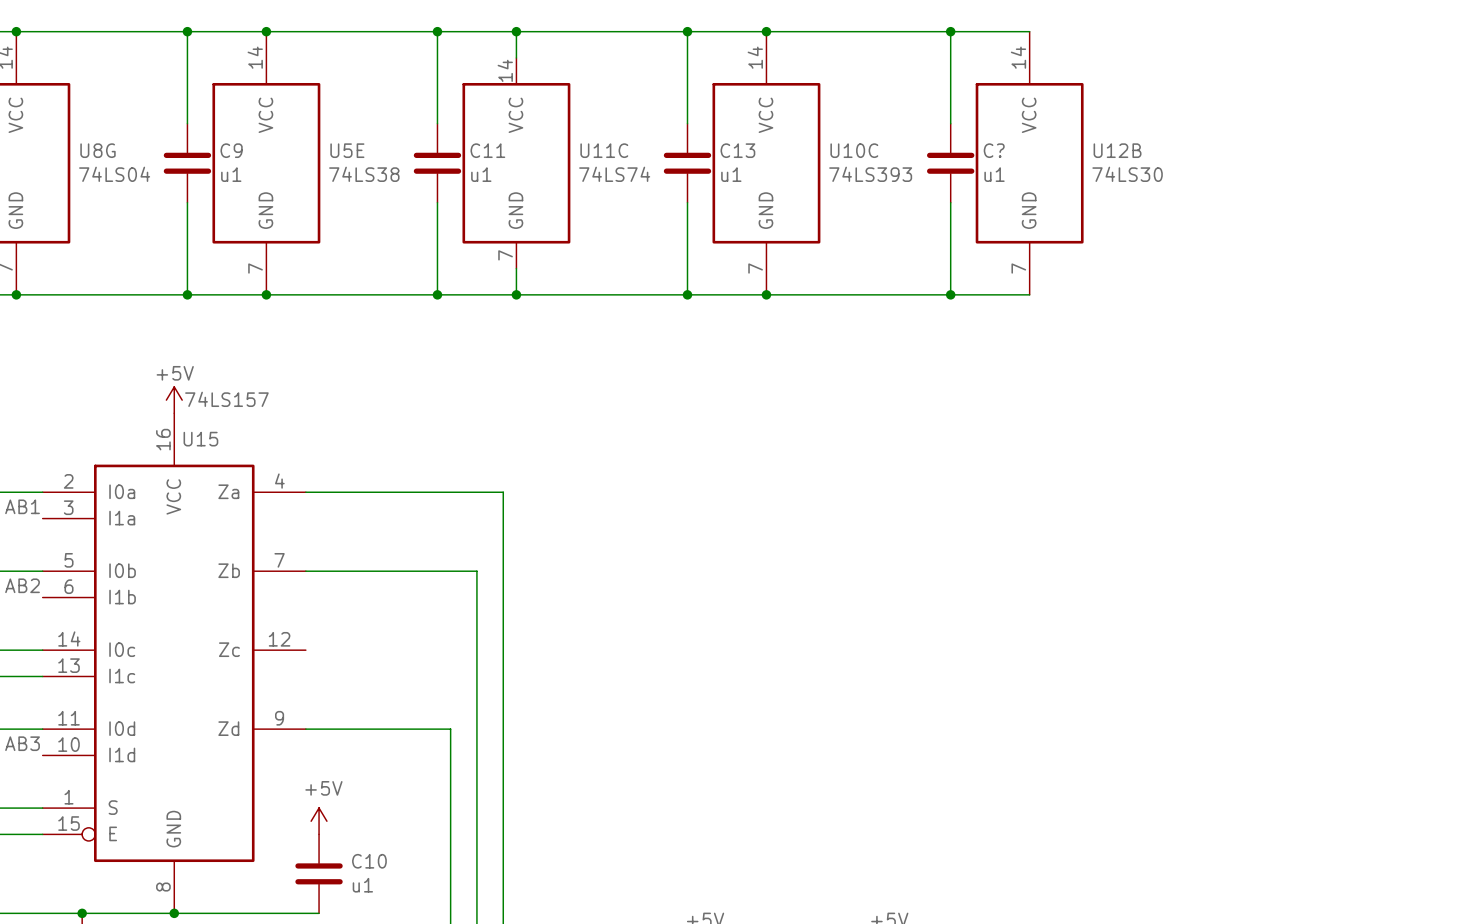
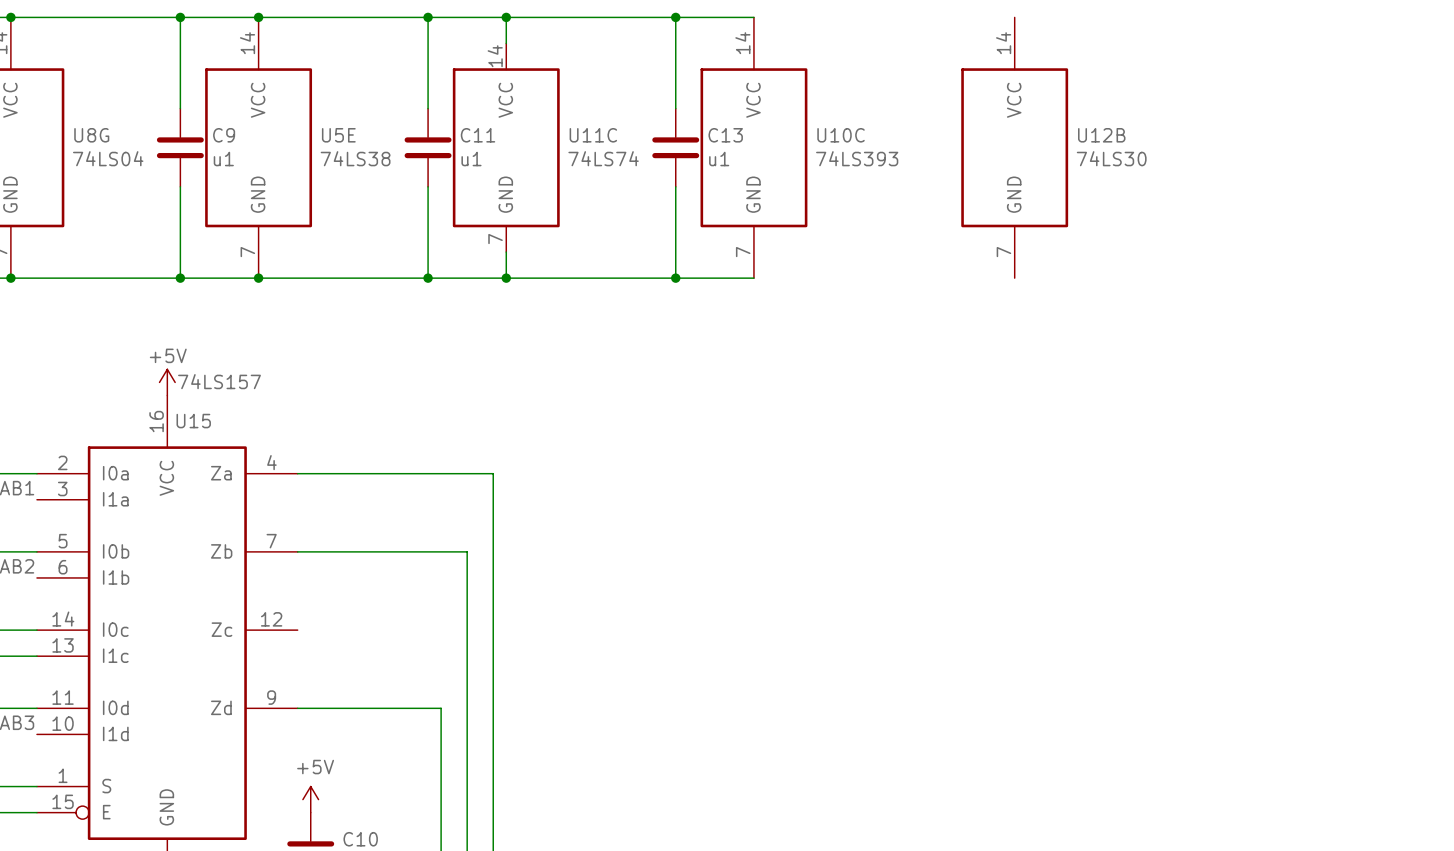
wire: (766, 31) (1029, 31) -> none
junction: (766, 31) -> none
wire: (950, 31) (950, 123) -> none
junction: (950, 31) -> none
C?: u1 (950, 163) -> none
wire: (950, 202) (950, 294) -> none
wire: (766, 294) (1029, 294) -> none
junction: (766, 294) -> none
junction: (950, 294) -> none

